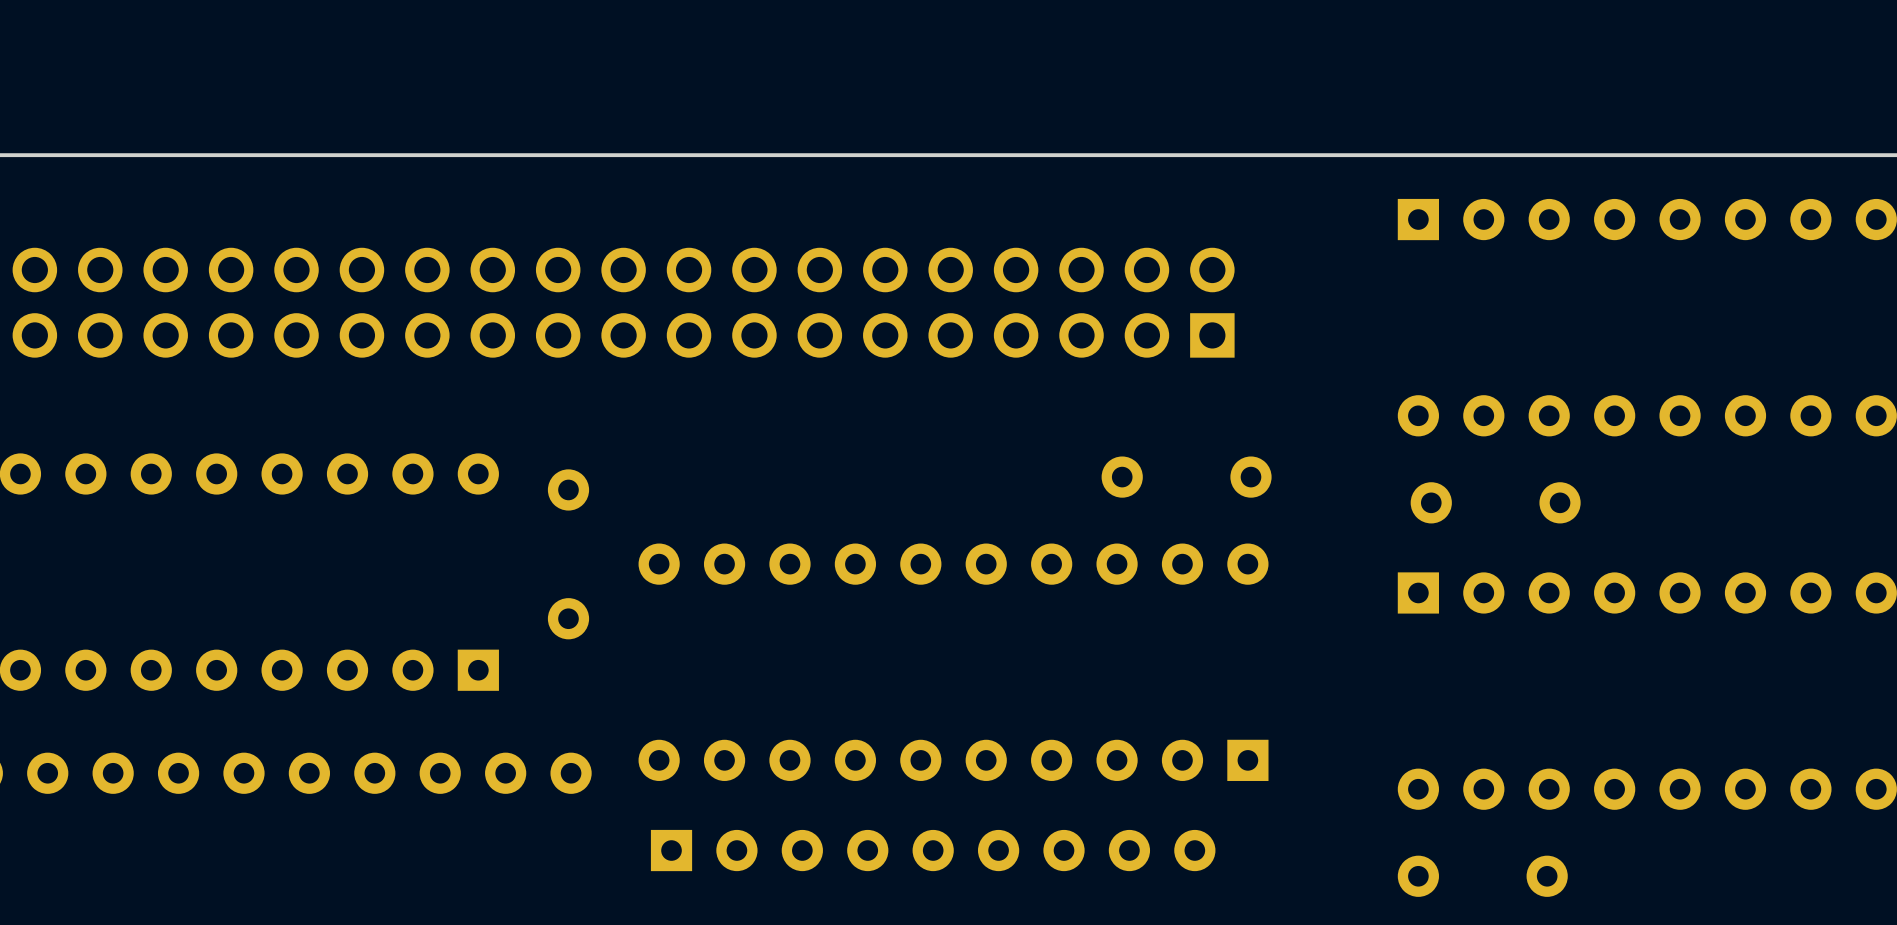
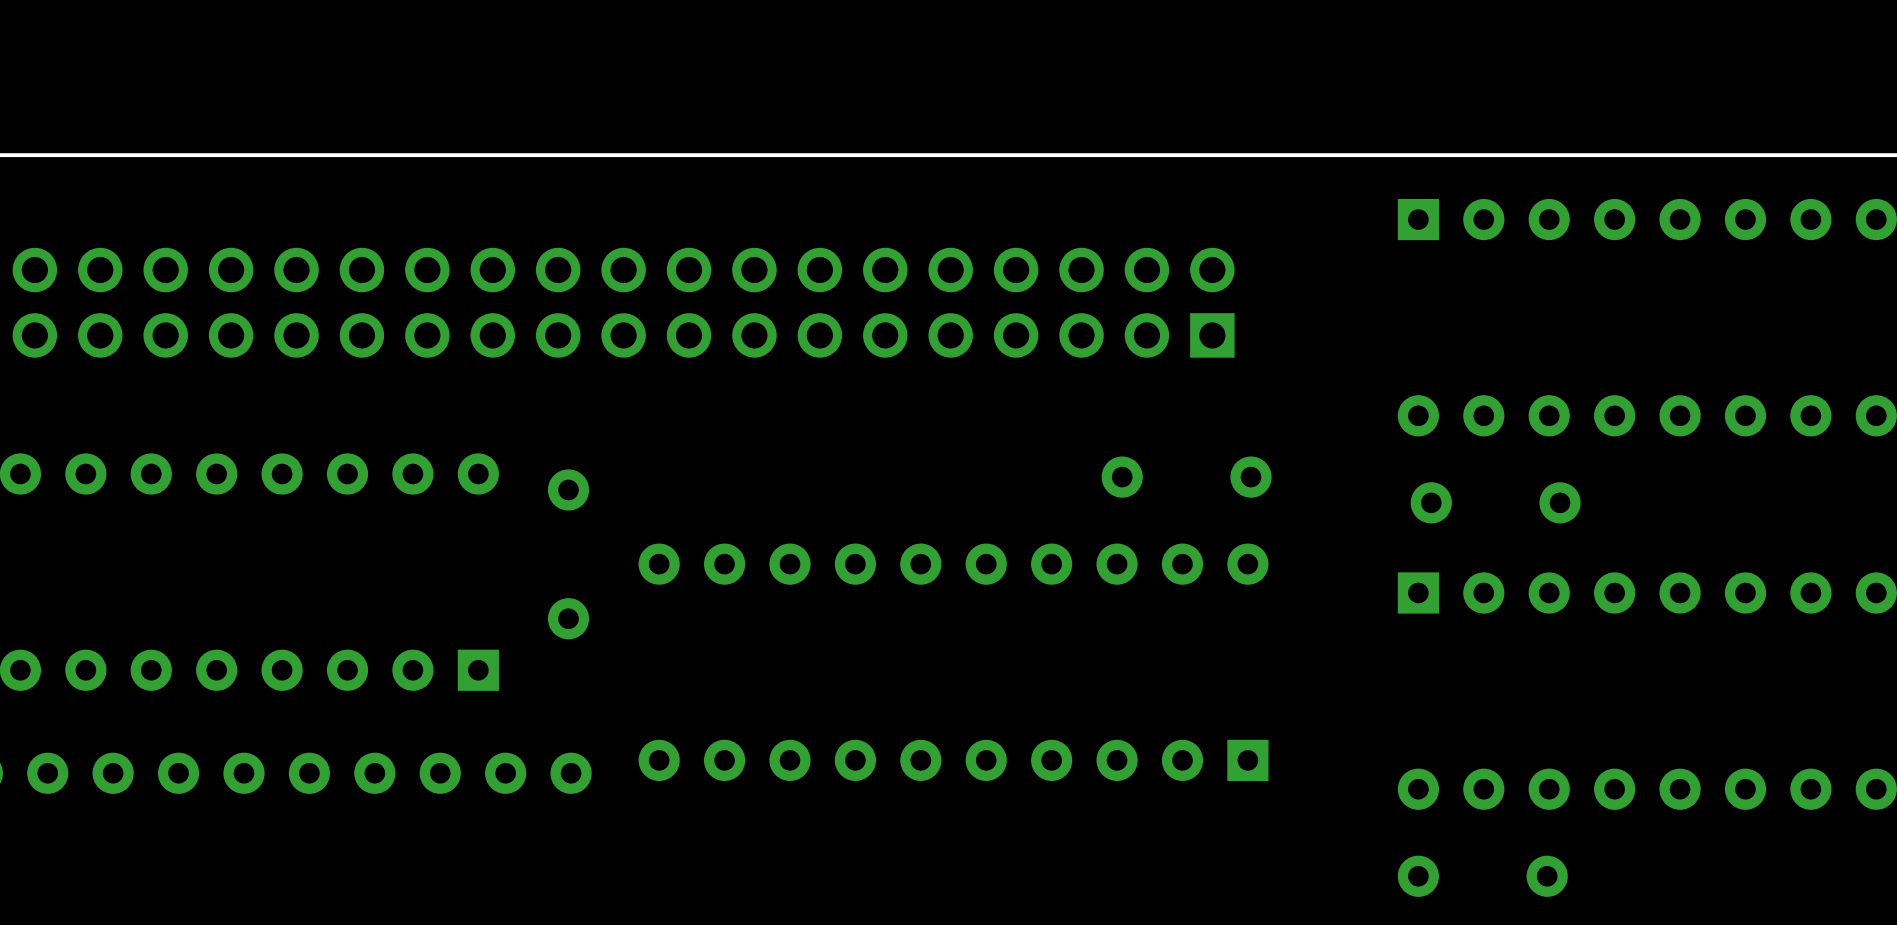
part: (933, 850) -> none

